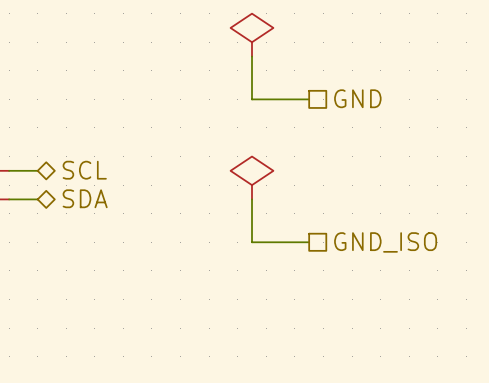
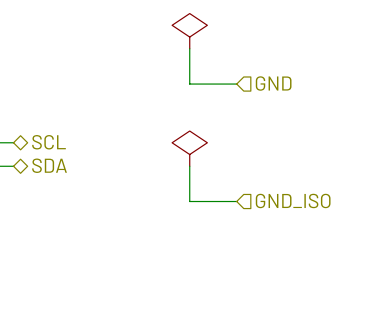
hierarchical label shape: passive (357, 98) -> input (273, 83)
hierarchical label shape: passive (385, 242) -> input (293, 200)

